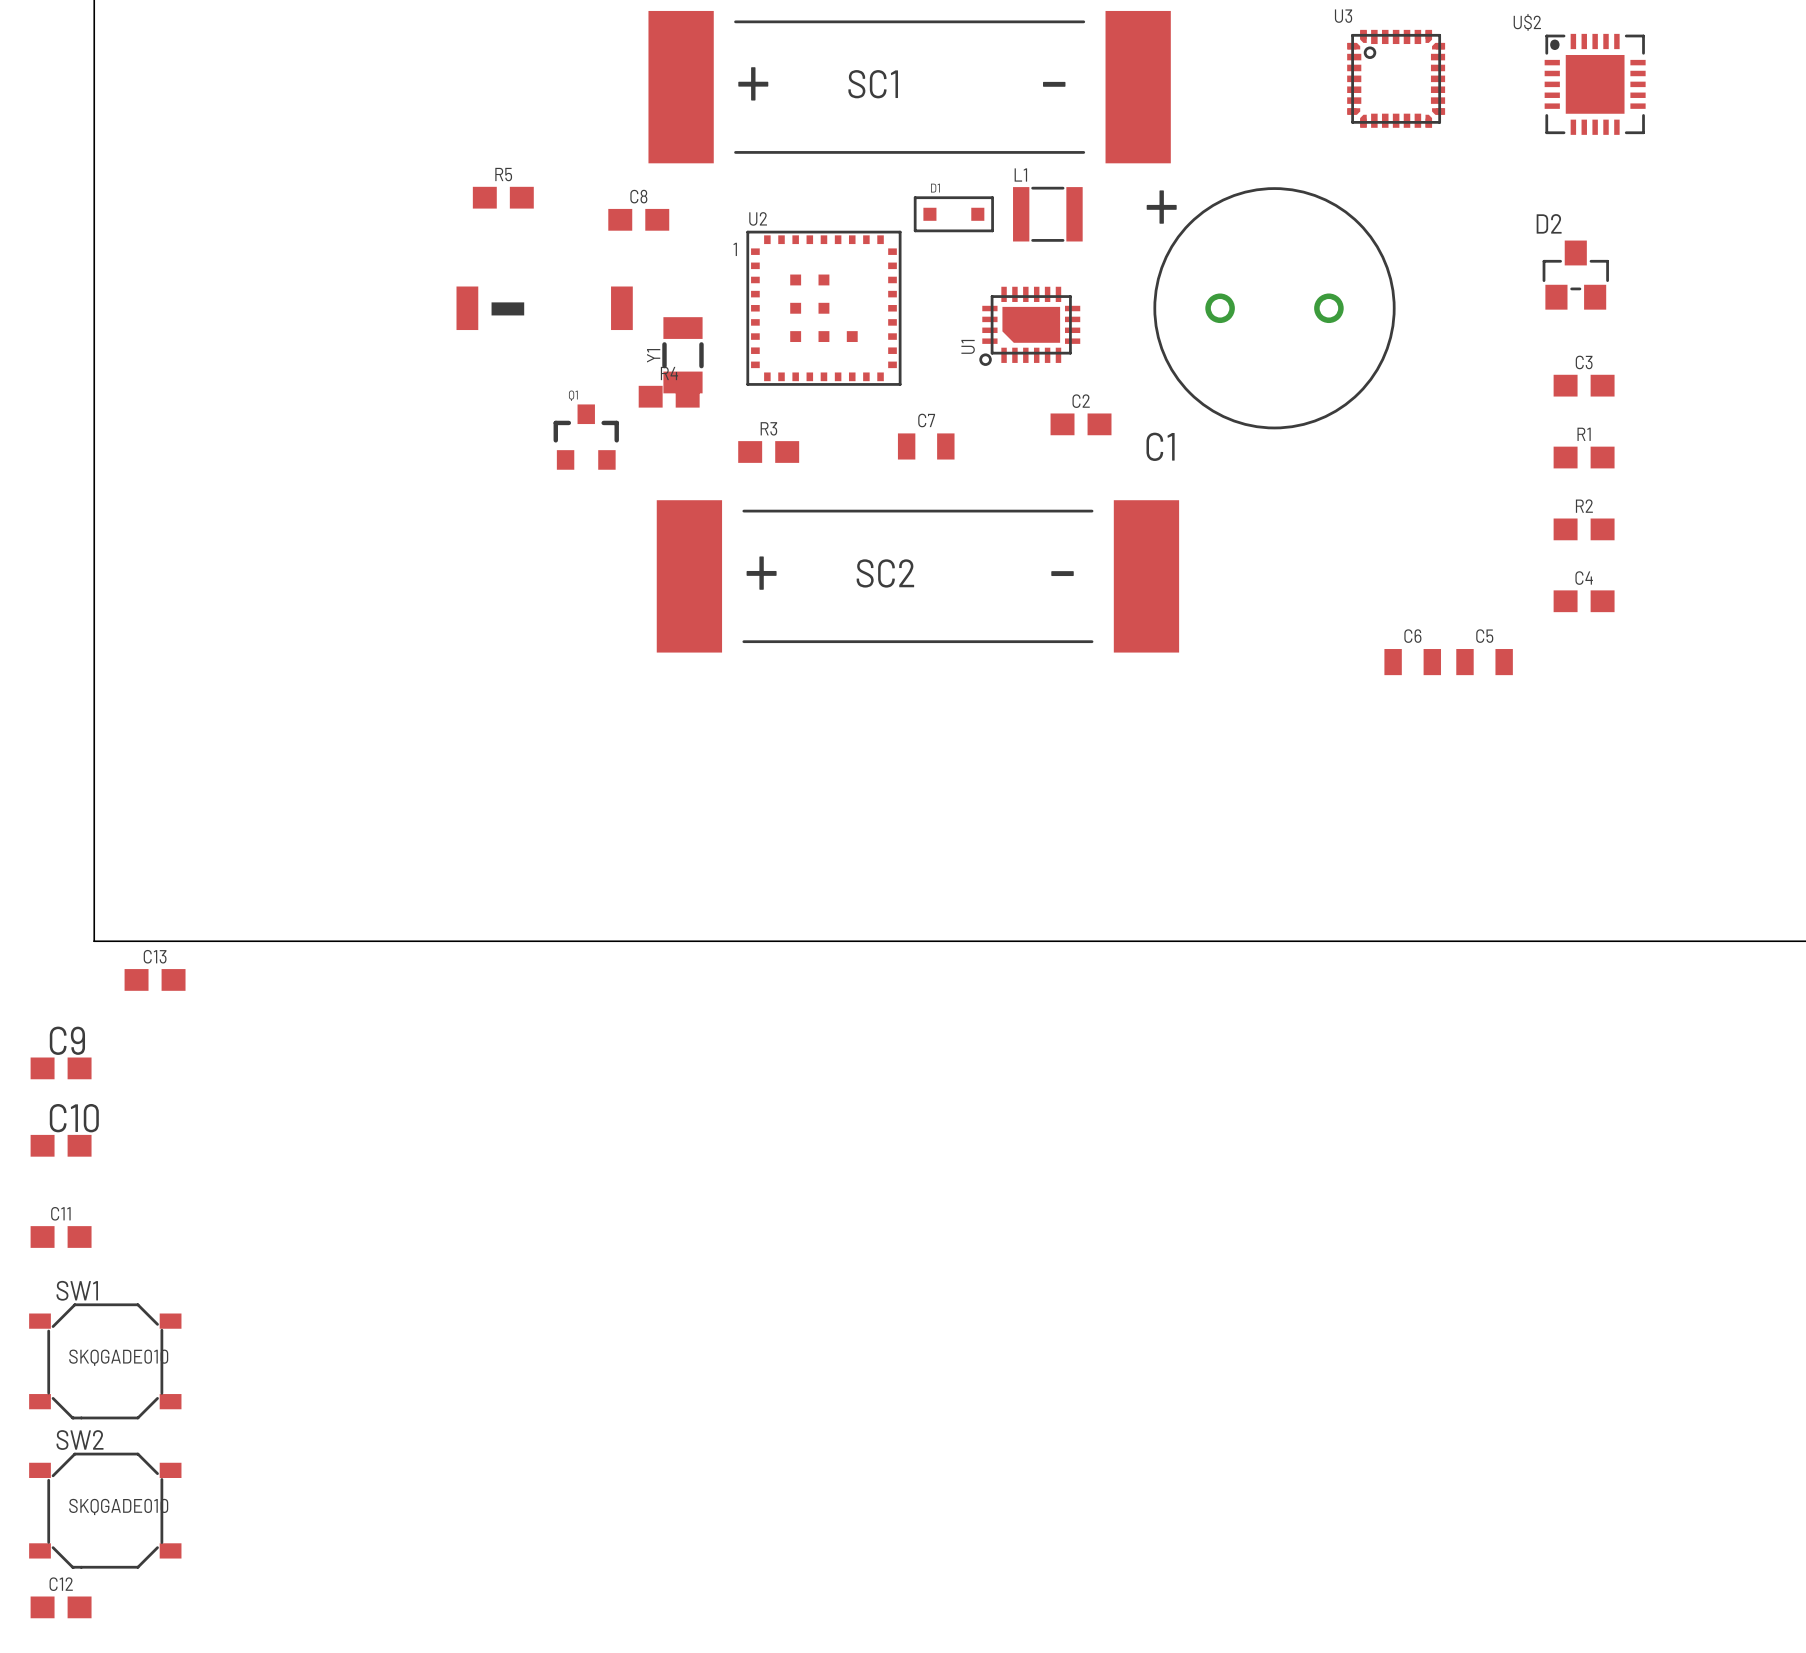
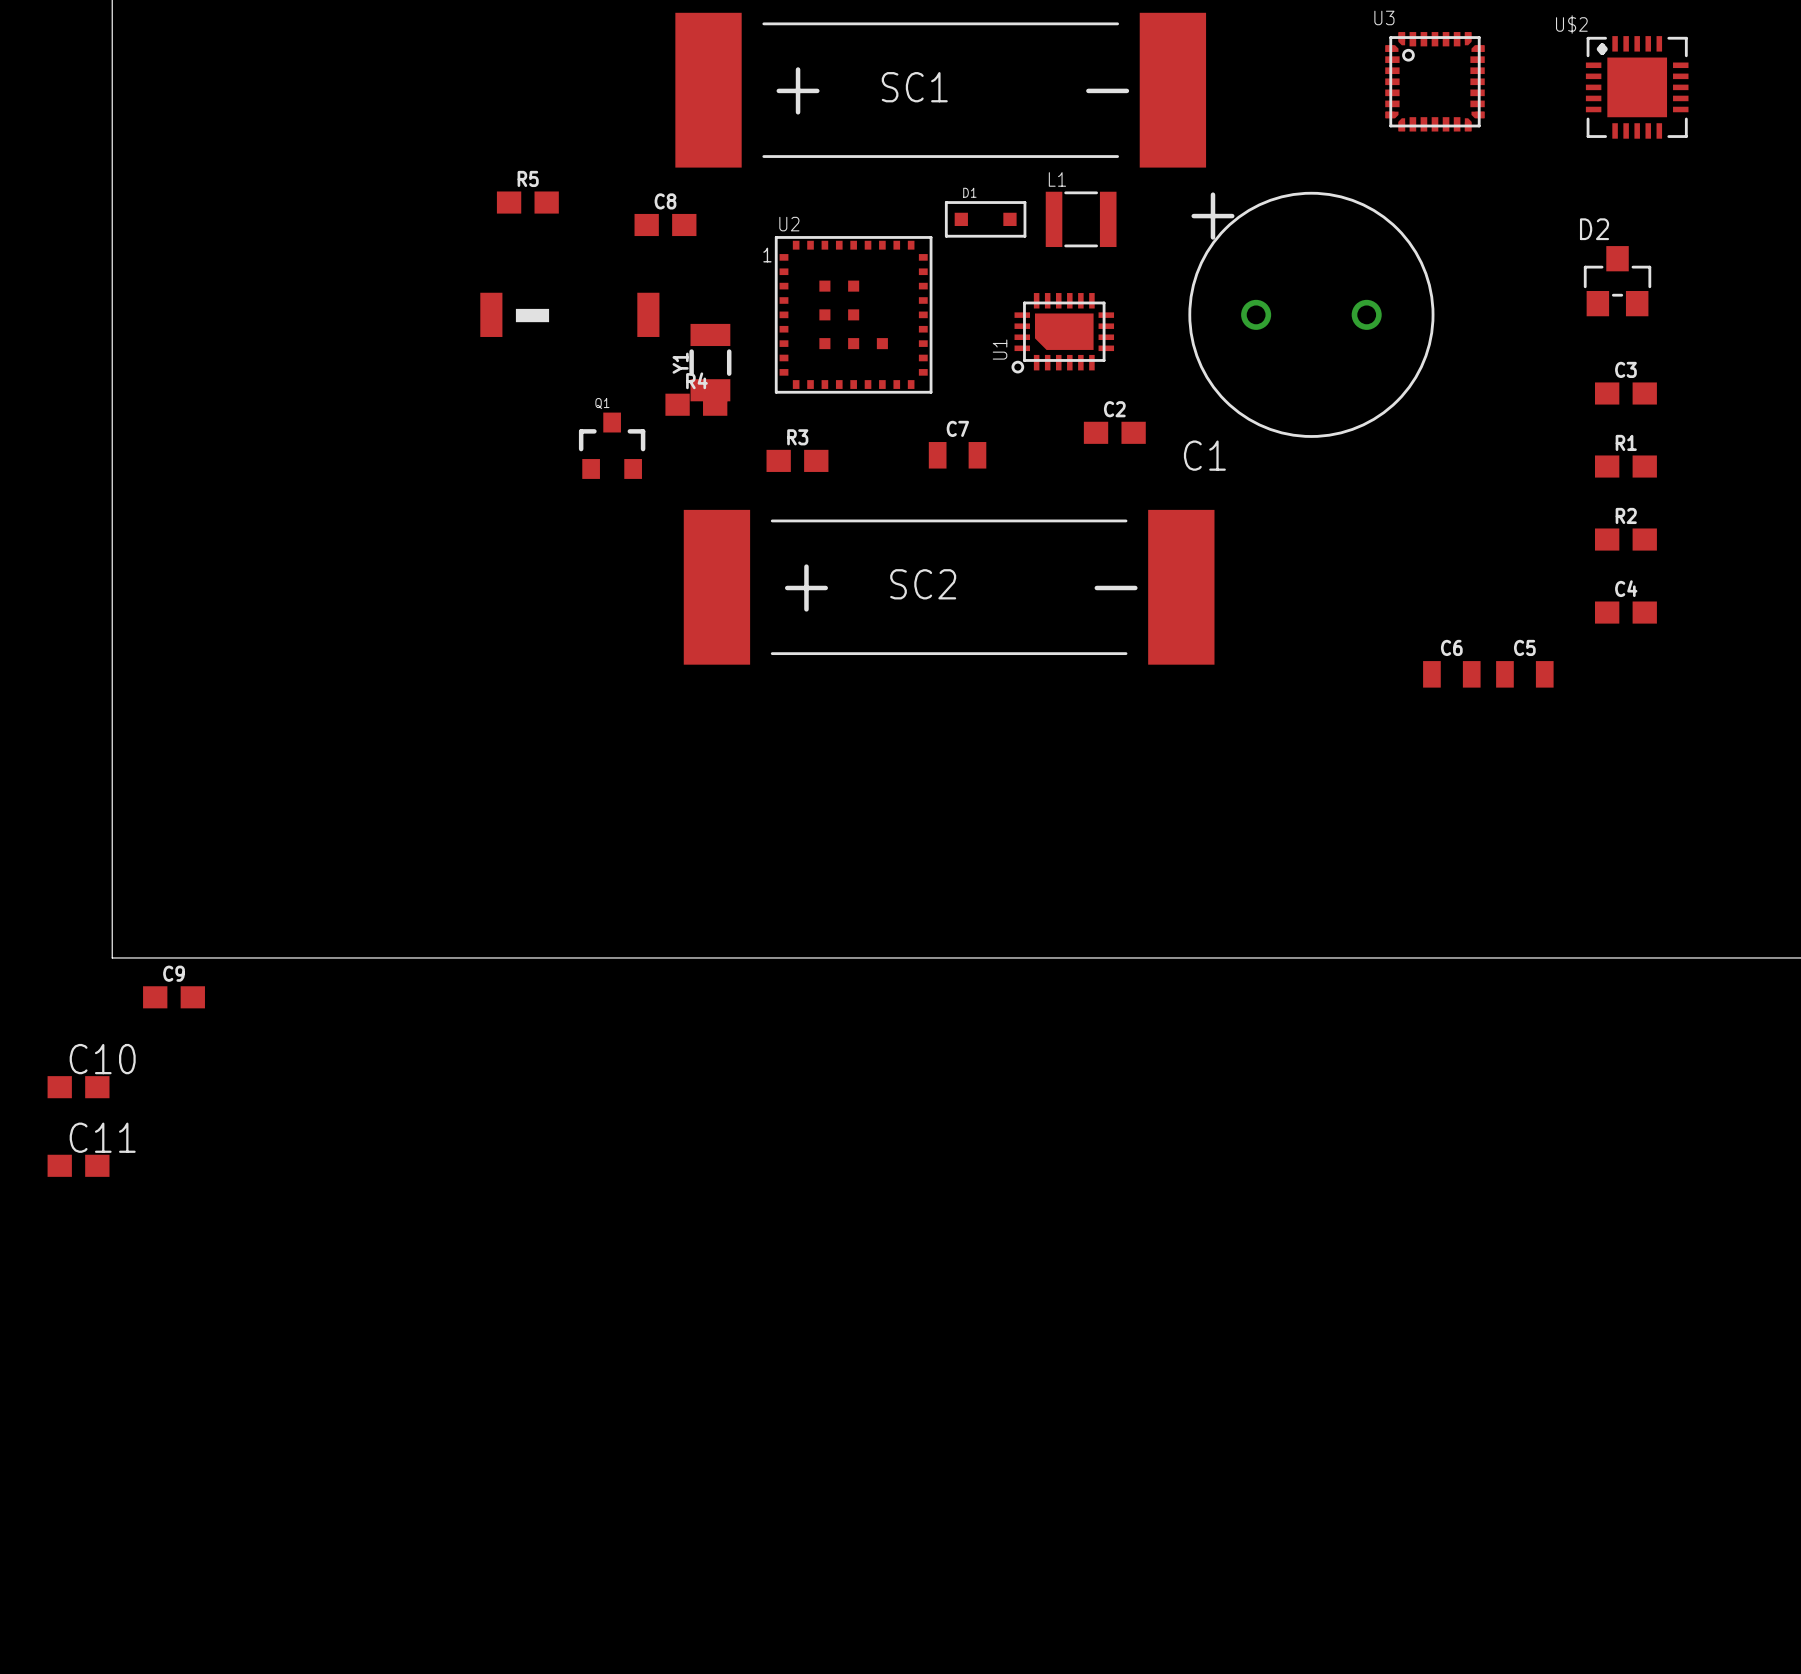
C13 name: C13 (155, 956) -> C9 (174, 973)
C9 name: C9 (67, 1040) -> C10 (102, 1059)
C10 name: C10 (74, 1118) -> C11 (102, 1137)
C11: (61, 1237) -> none
SW1: SKQGADE010 (105, 1361) -> none
SW2: SKQGADE010 (105, 1510) -> none
C12: (61, 1607) -> none

